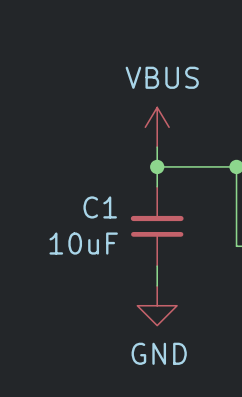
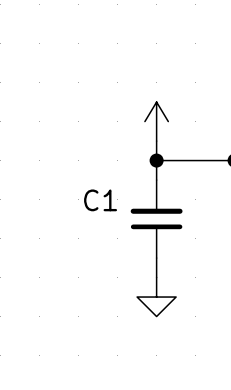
power symbol text: VBUS (162, 77) -> none
C1 value: 10uF (83, 243) -> none
power symbol text: GND (159, 353) -> none

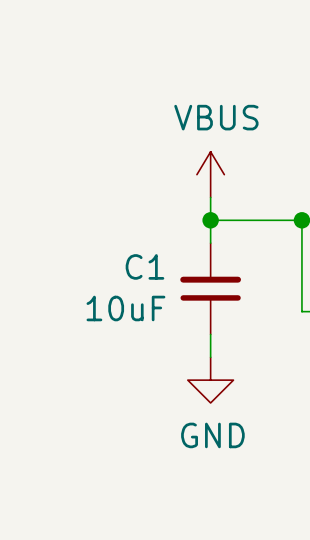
power symbol text: none -> VBUS (216, 117)
C1 value: none -> 10uF (125, 308)
power symbol text: none -> GND (212, 435)

